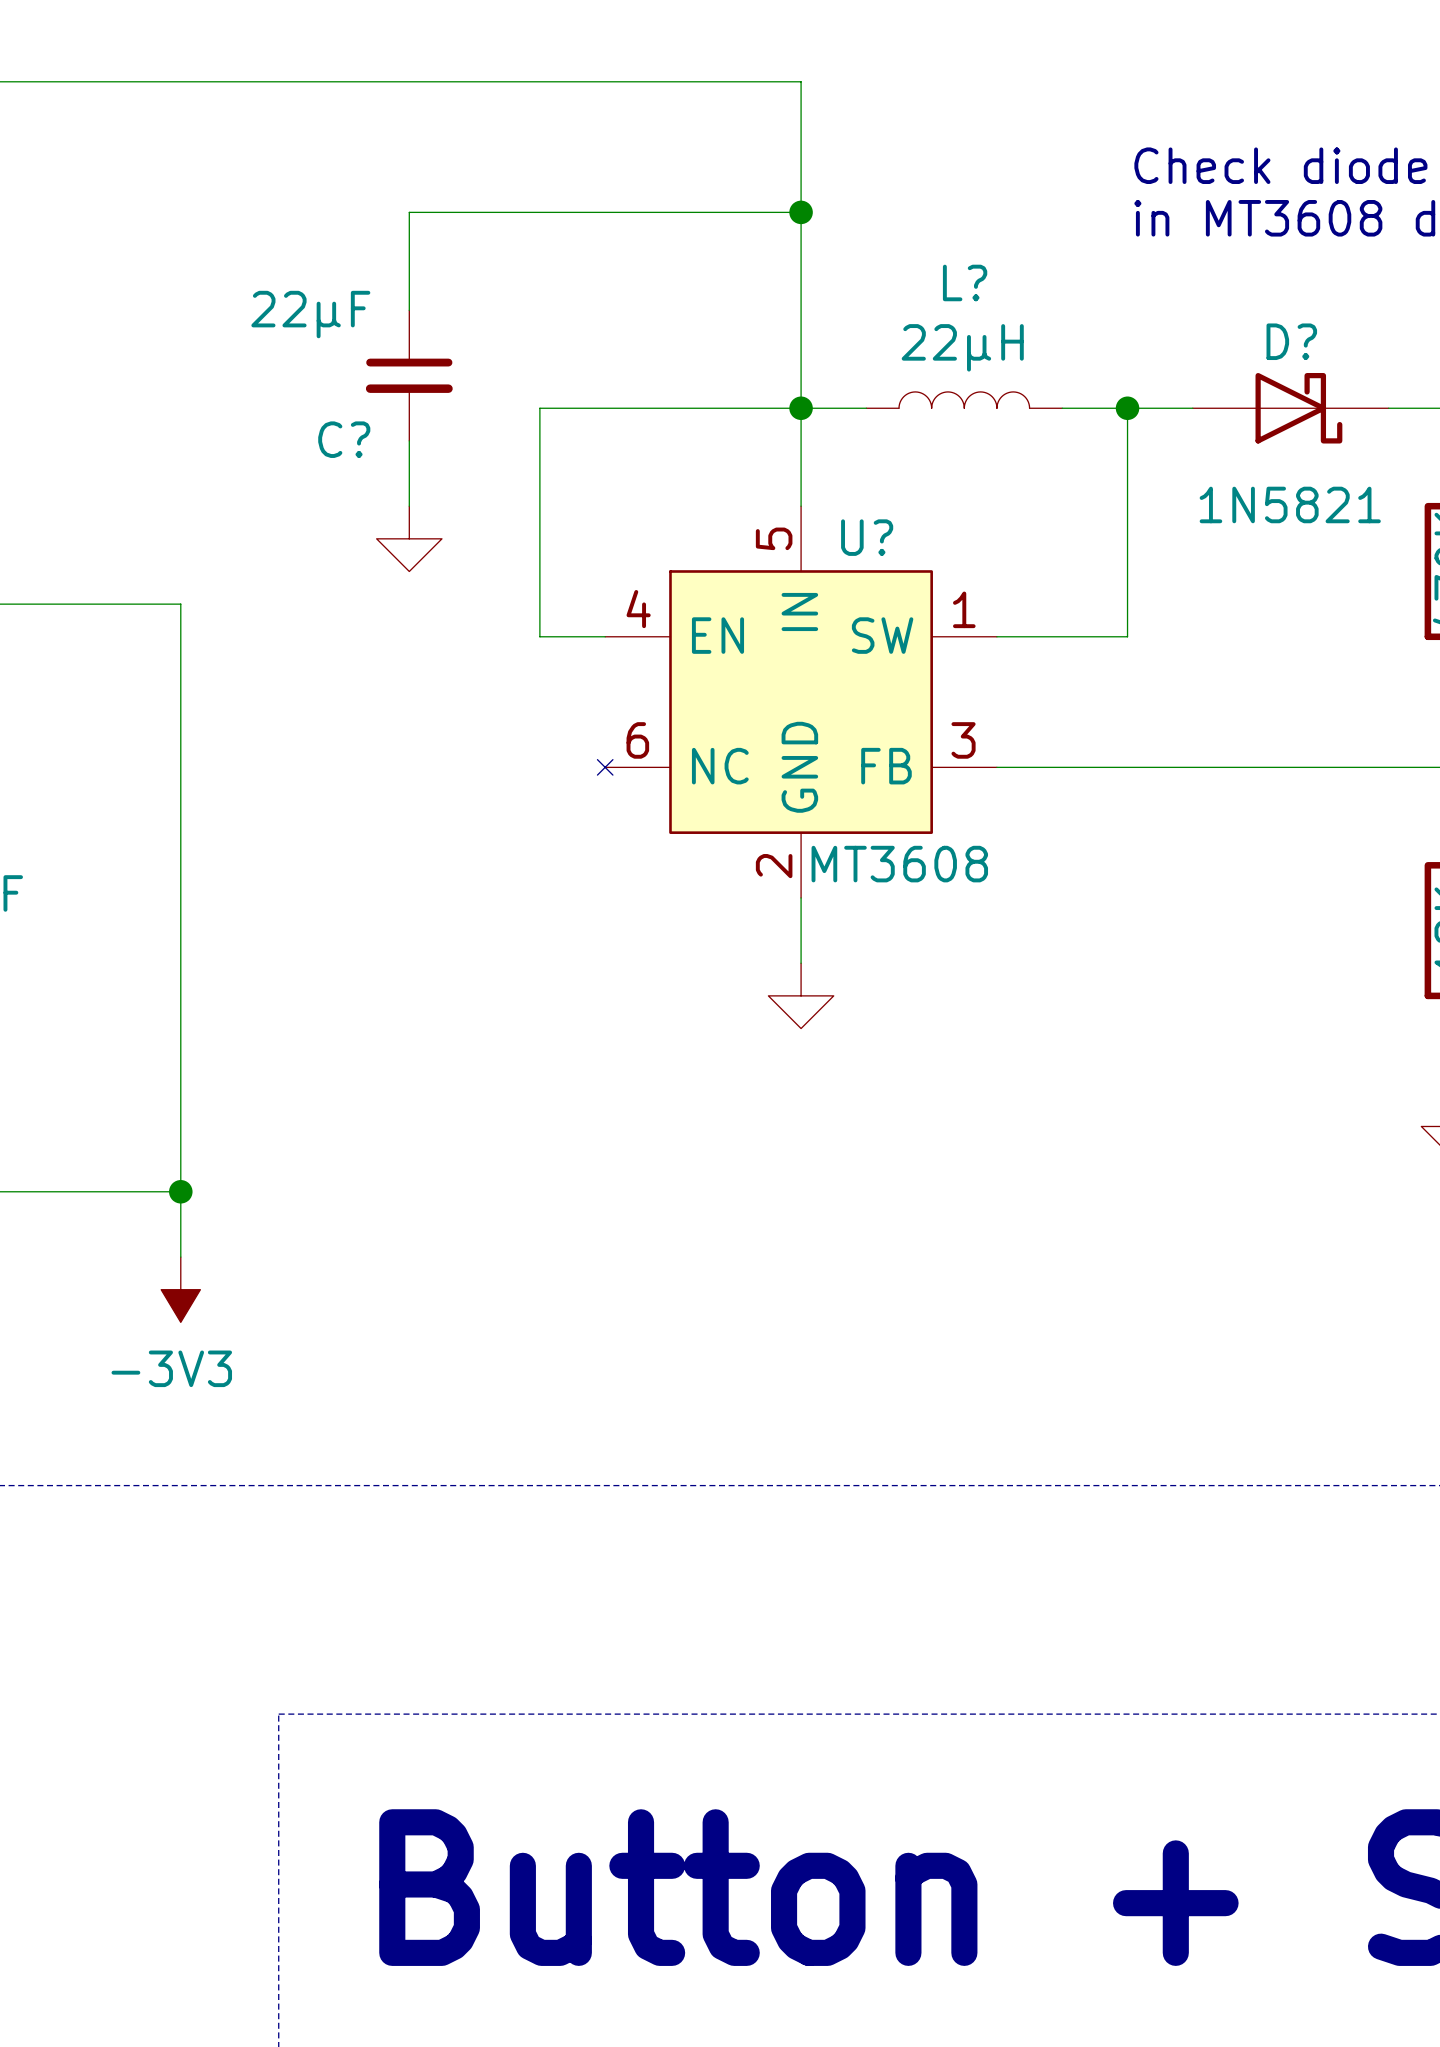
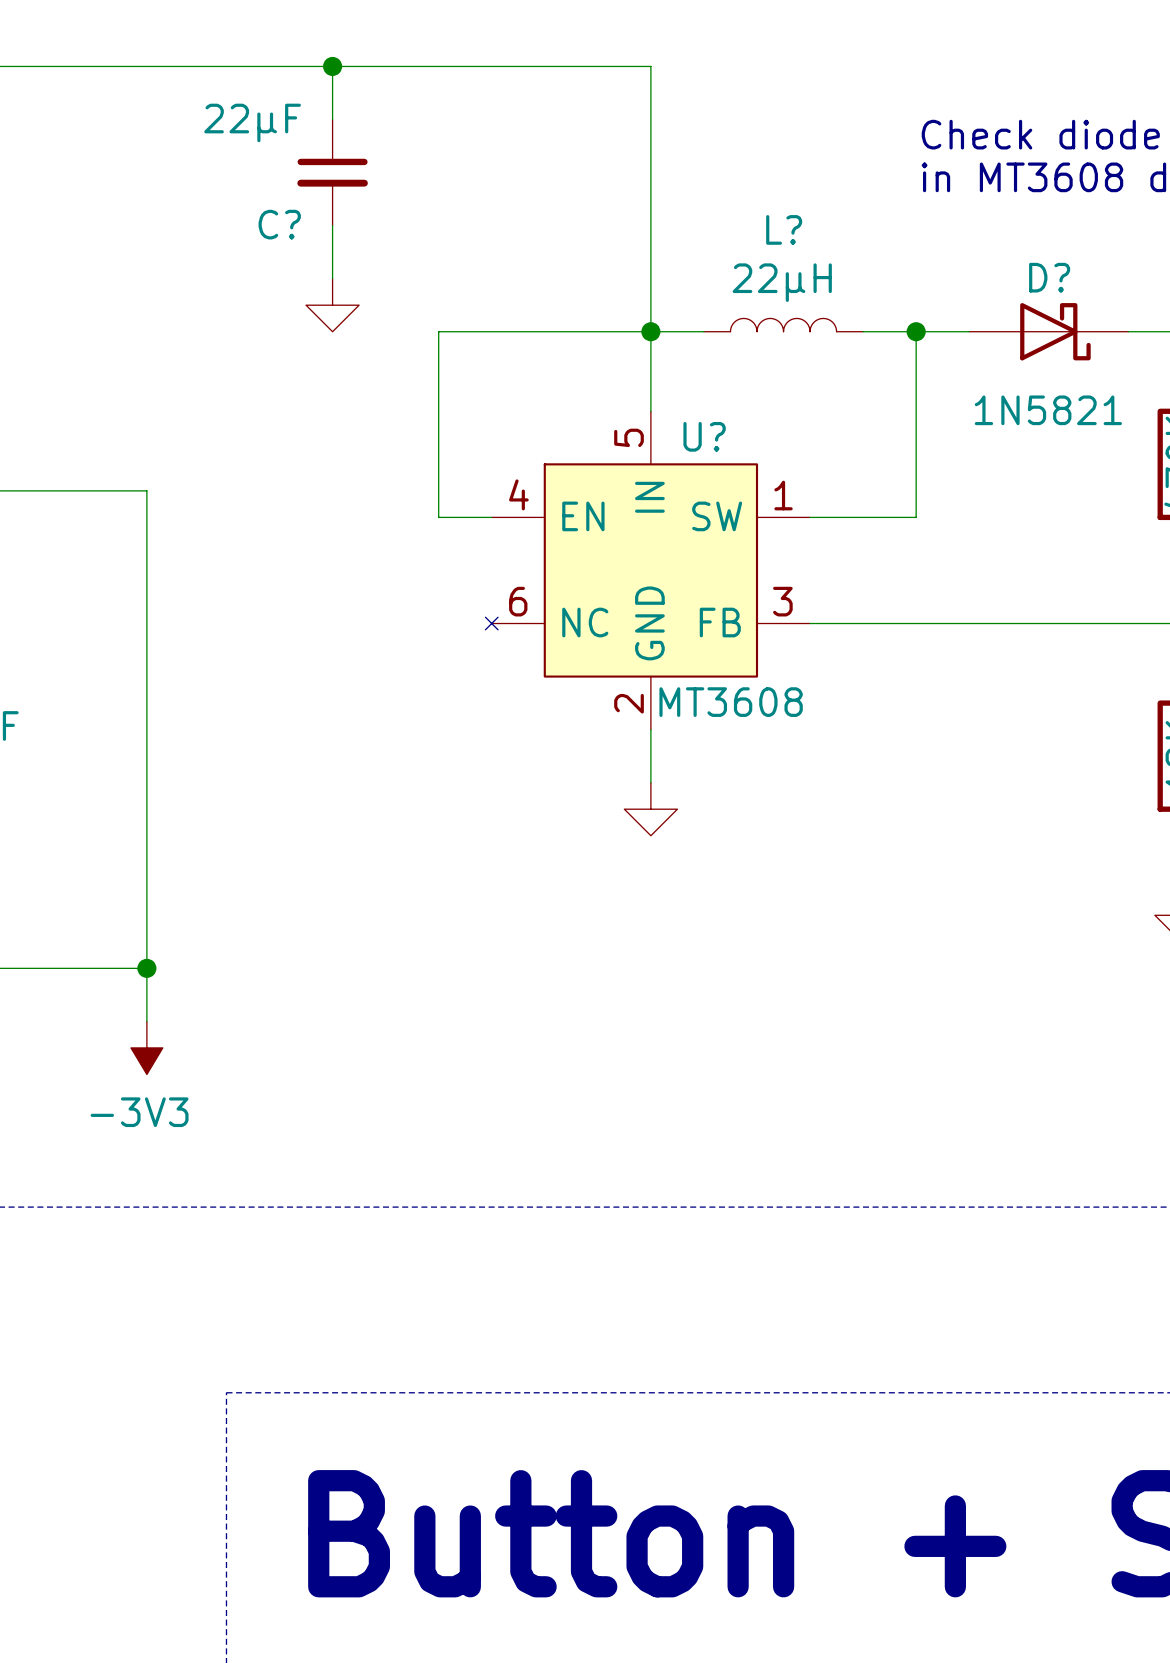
junction: none -> (332, 66)
wire: (801, 212) (409, 212) (409, 277) -> none
junction: (801, 212) -> none
C? position: (409, 375) -> (332, 172)
wire: (409, 440) (409, 506) -> (332, 66) (332, 119)
power symbol position: (409, 538) -> (332, 305)

